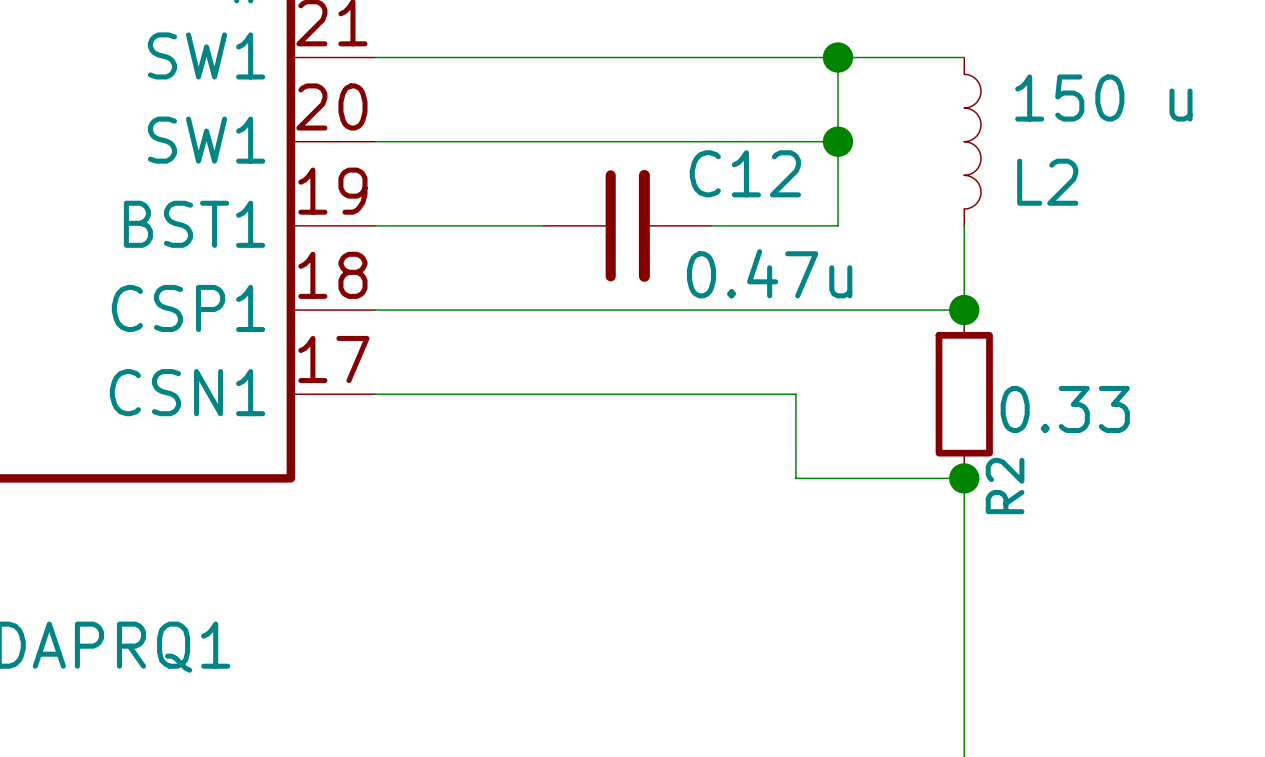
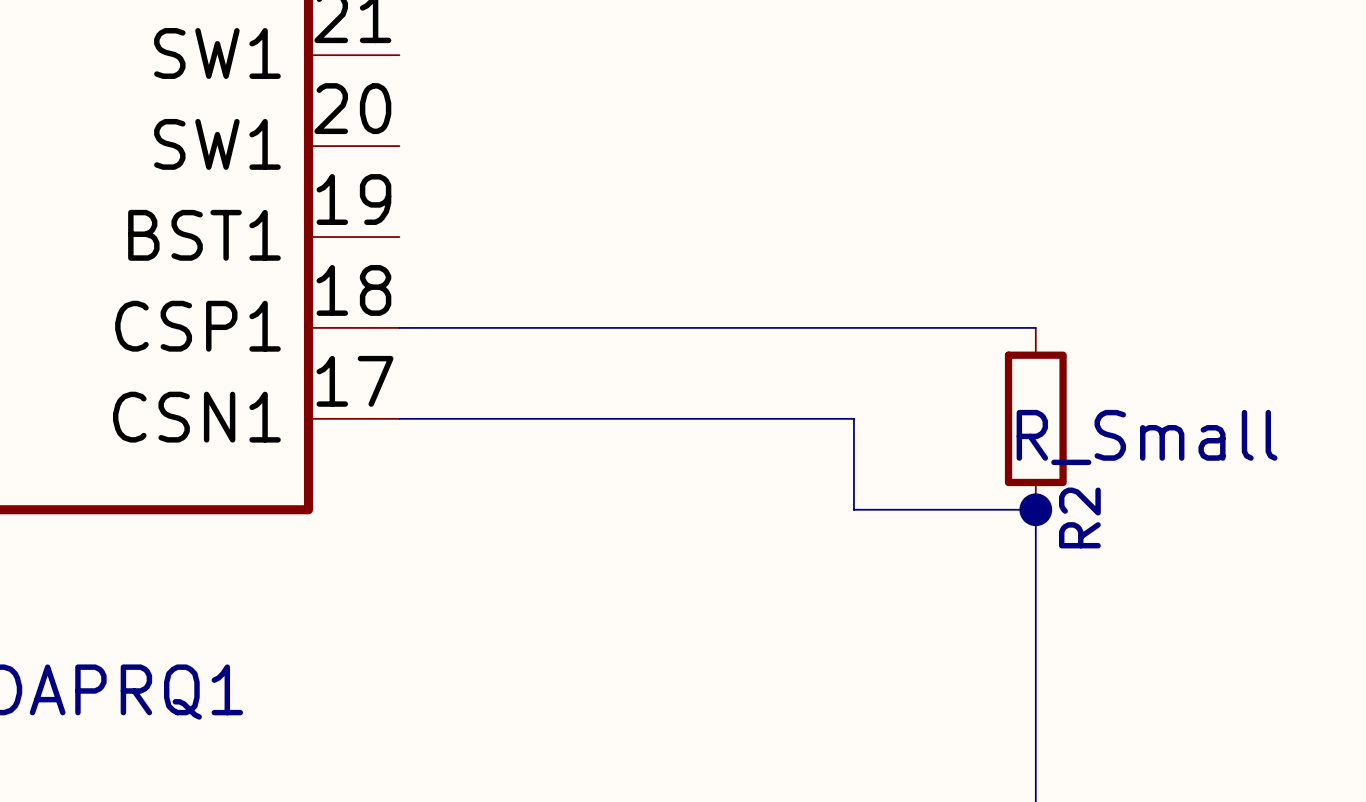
wire: (375, 57) (964, 57) -> none
wire: (837, 57) (837, 225) (711, 225) -> none
junction: (837, 57) -> none
wire: (375, 141) (837, 141) -> none
junction: (837, 141) -> none
L2: 150 u (972, 141) -> none
wire: (375, 225) (543, 225) -> none
C12: 0.47u (627, 225) -> none
wire: (964, 225) (964, 310) -> none
junction: (964, 310) -> none
R2 value: 0.33 (1065, 409) -> R_Small (1147, 437)

